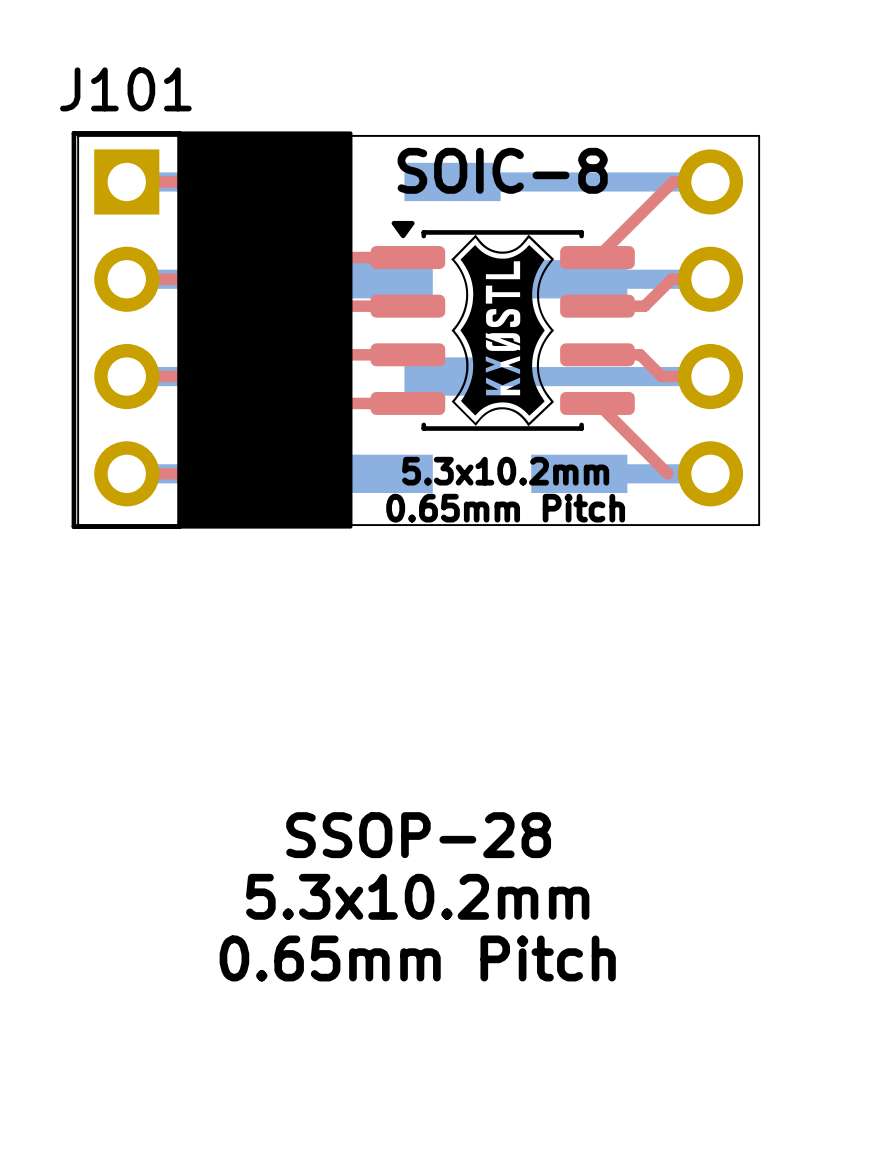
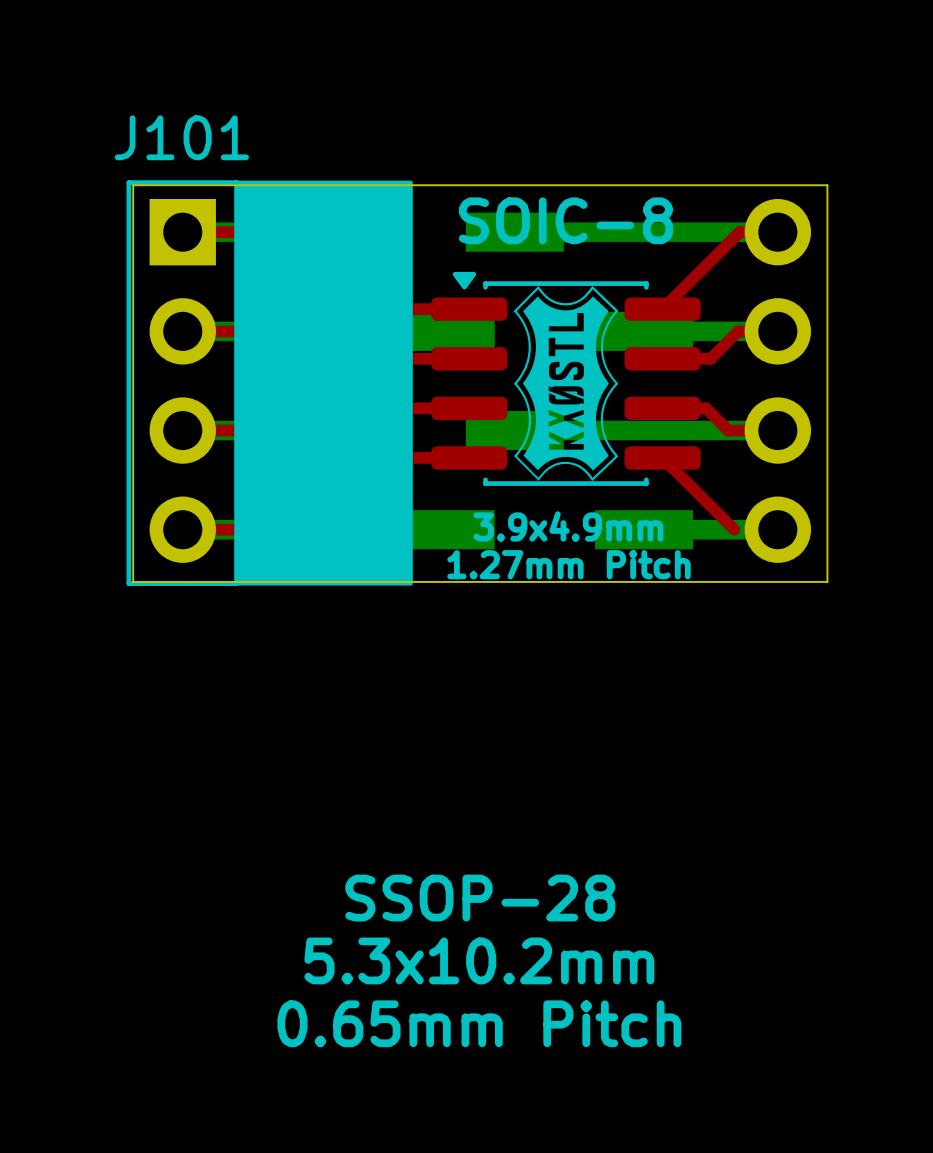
text: 5.3x10.2mm (505, 471) -> 3.9x4.9mm (568, 526)
text: 0.65mm Pitch (505, 508) -> 1.27mm Pitch (569, 564)

